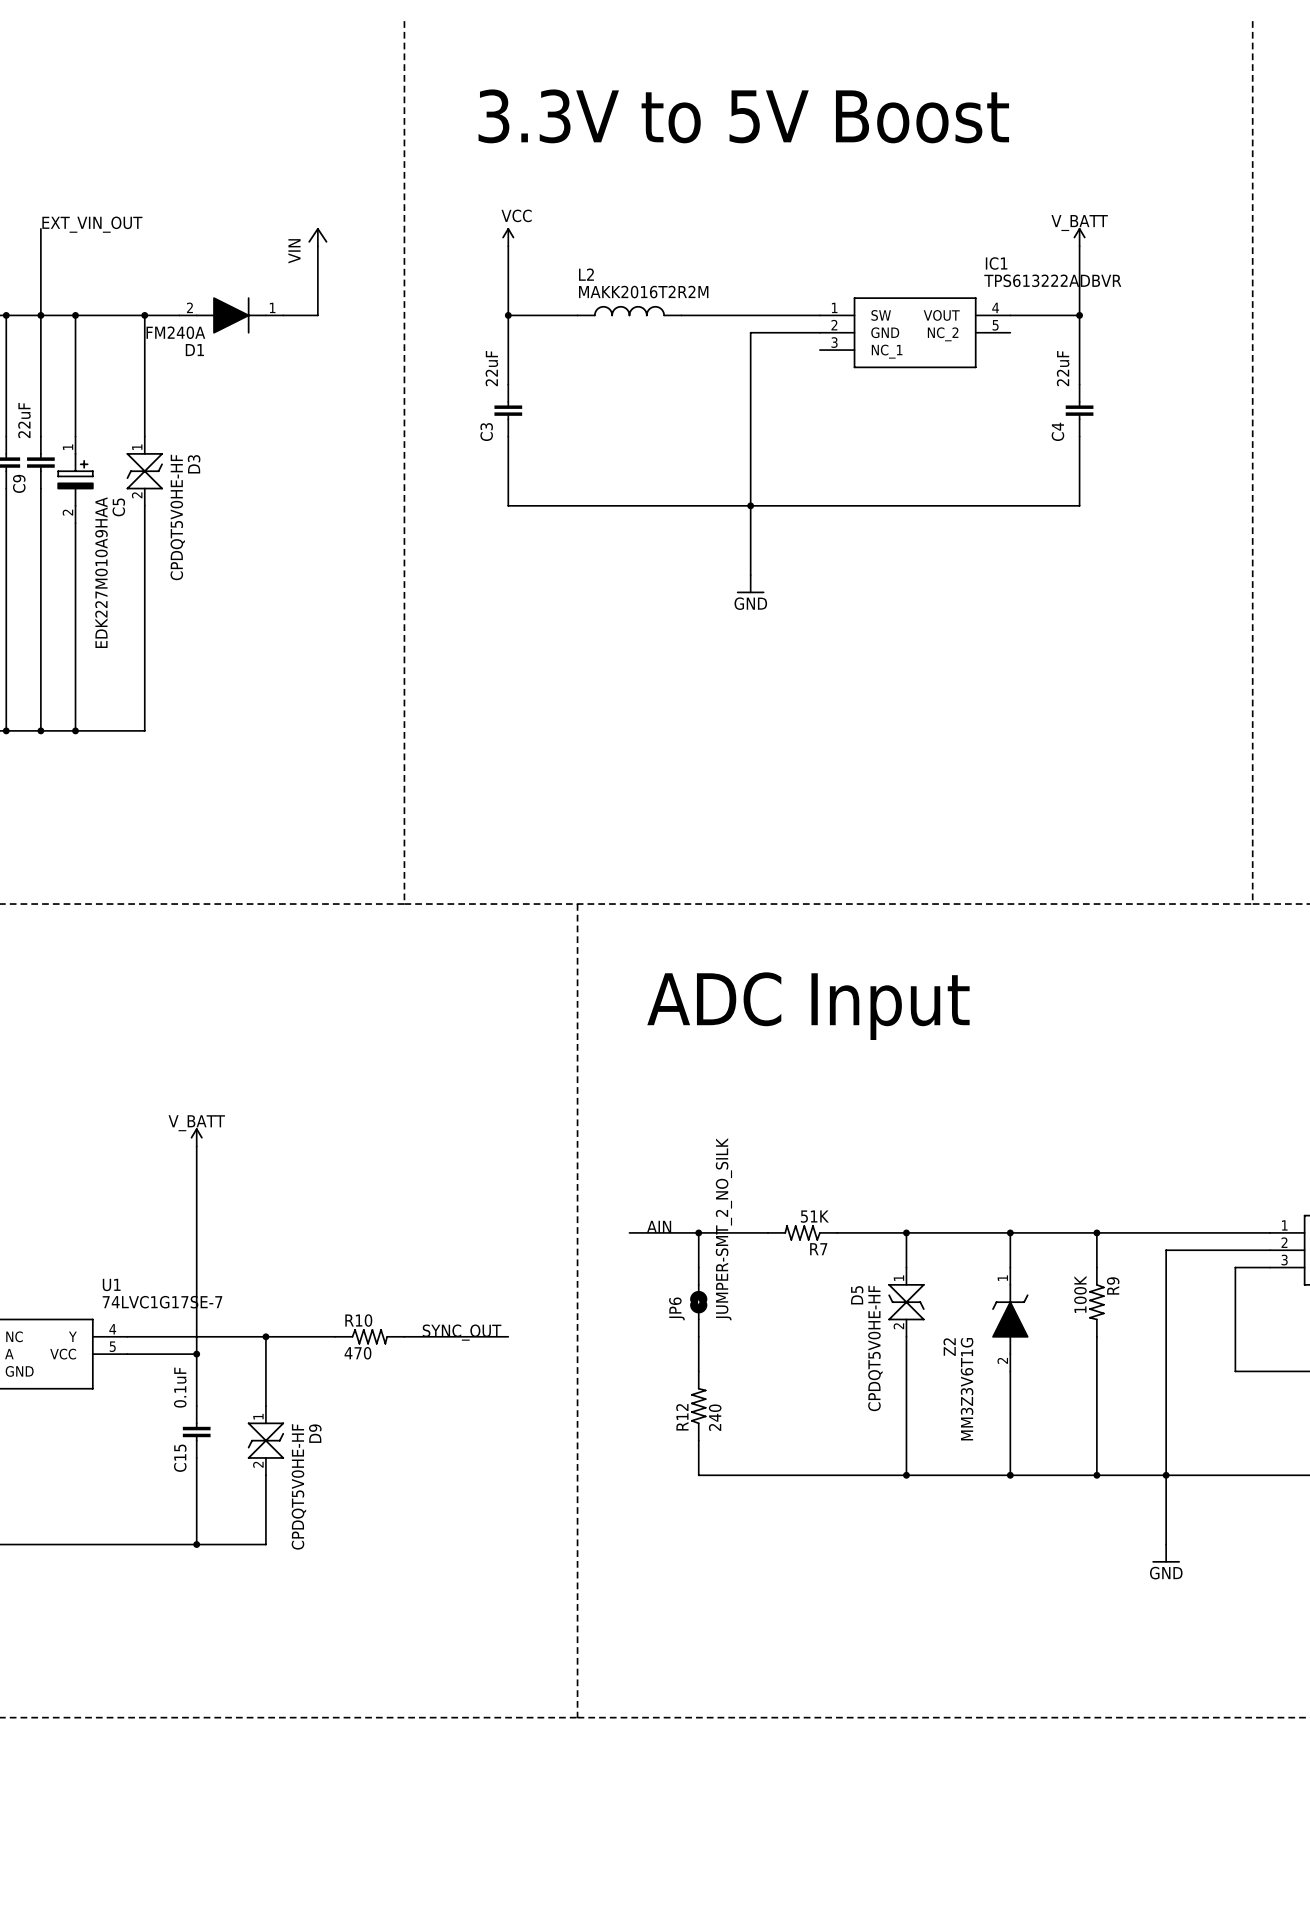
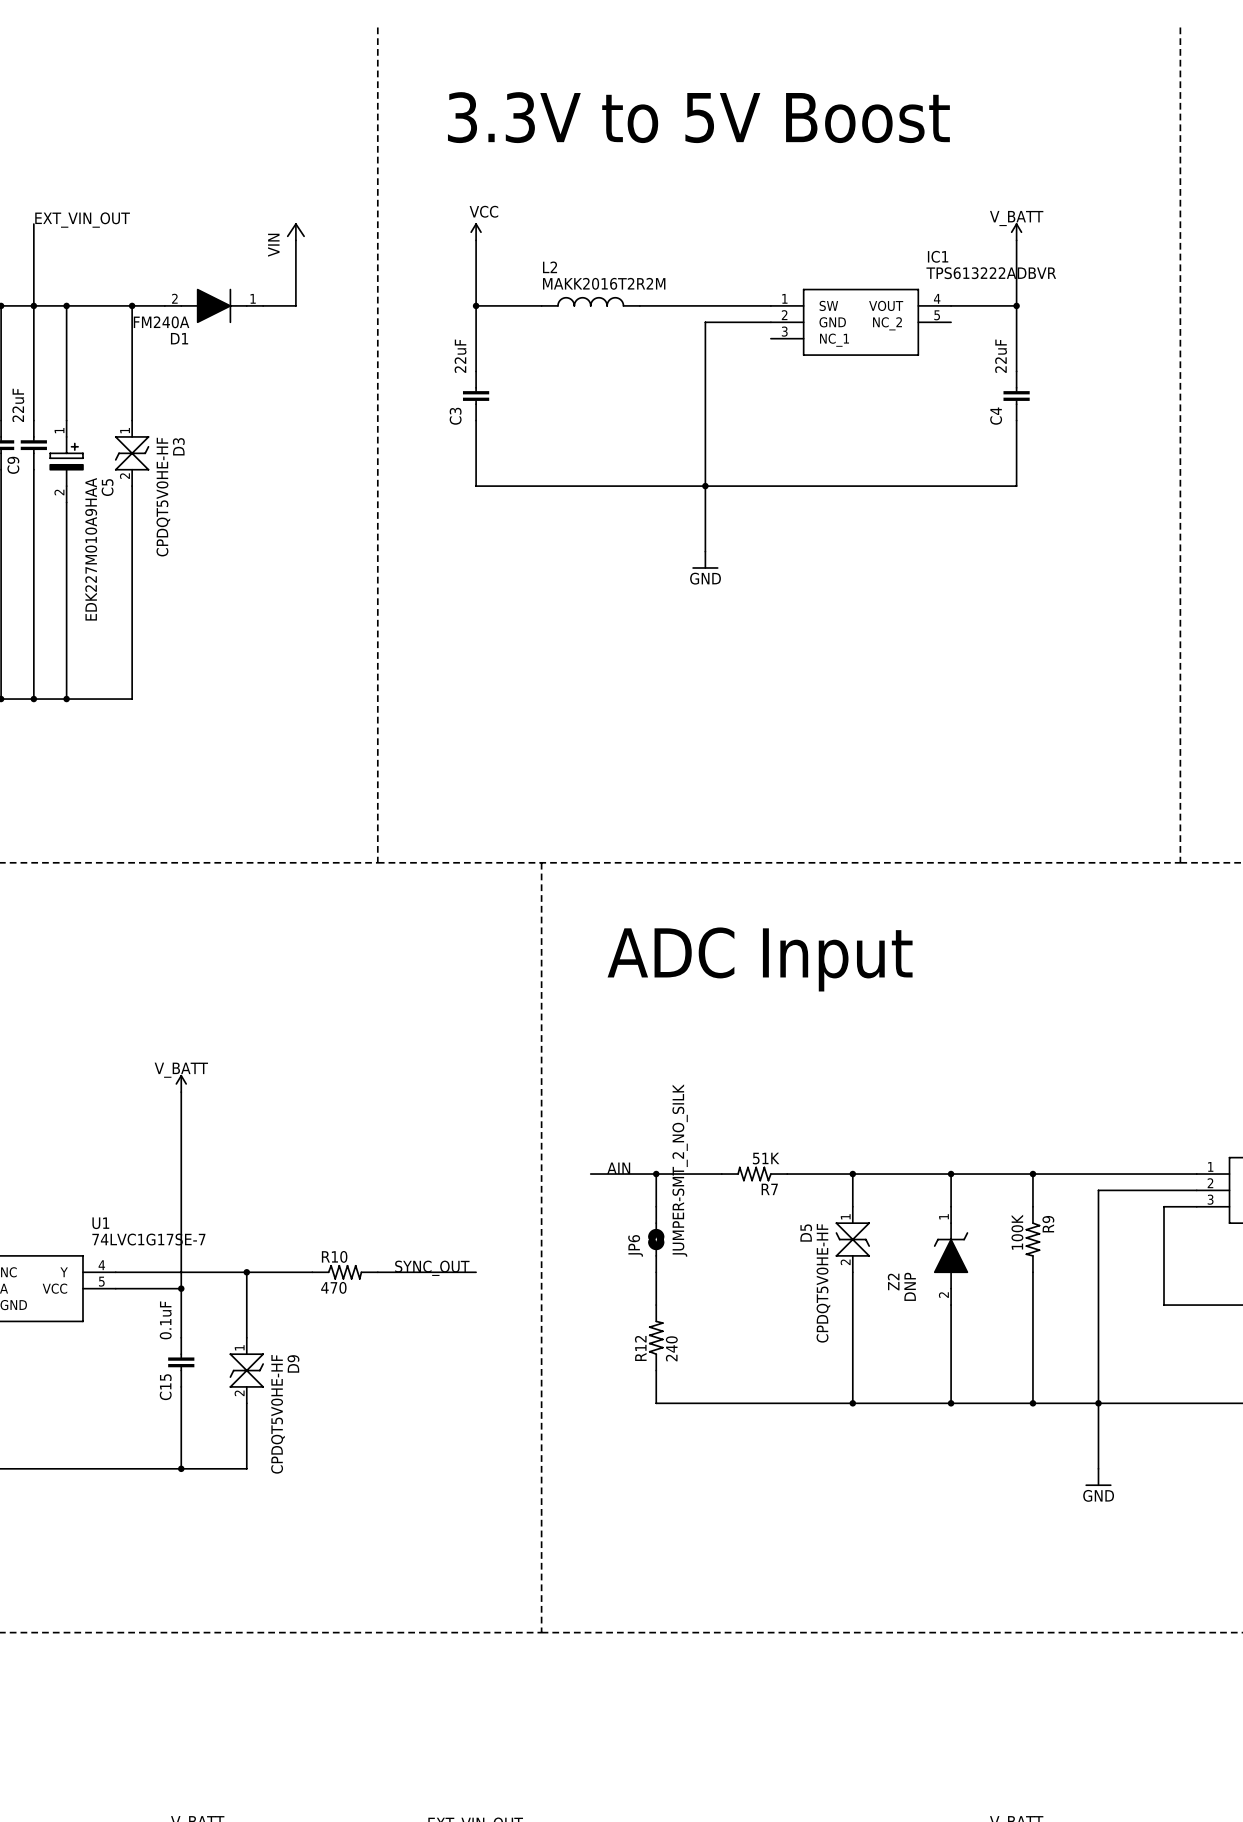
Z2 value: MM3Z3V6T1G (967, 1389) -> DNP (910, 1286)

